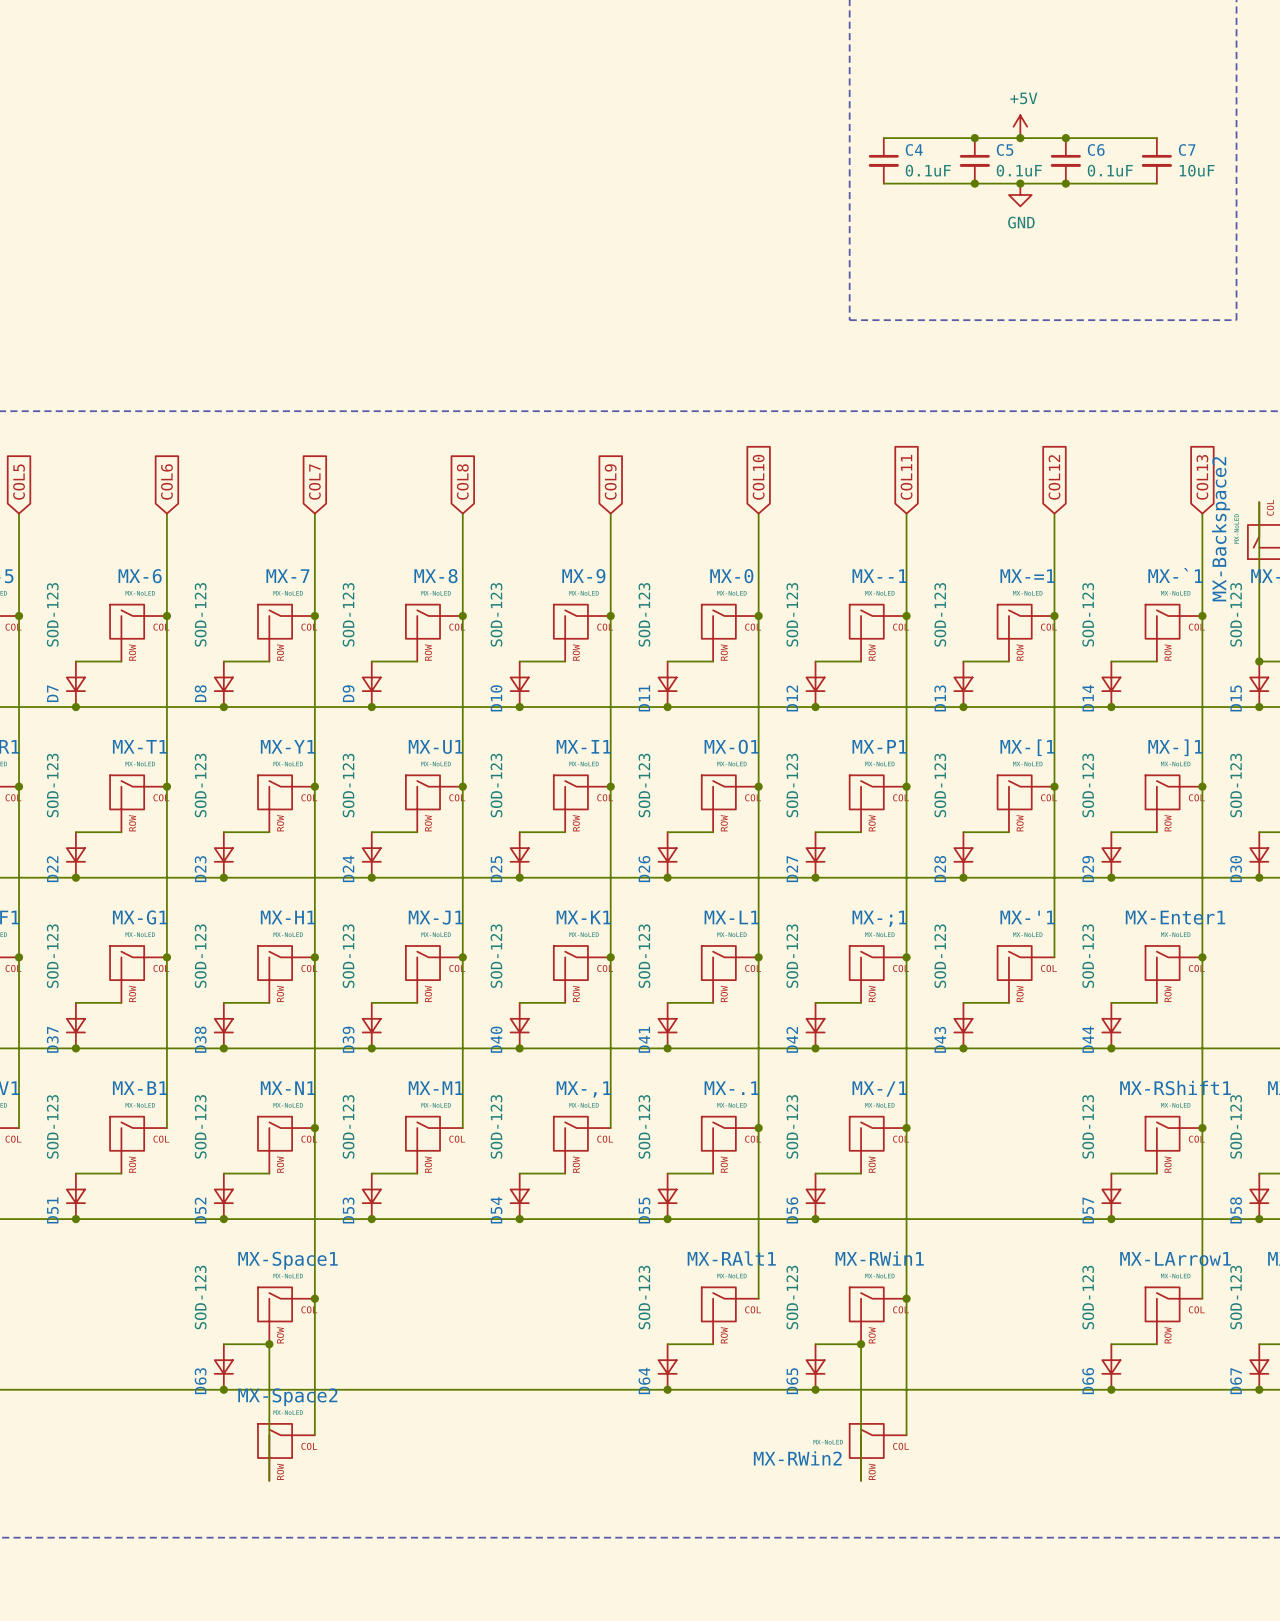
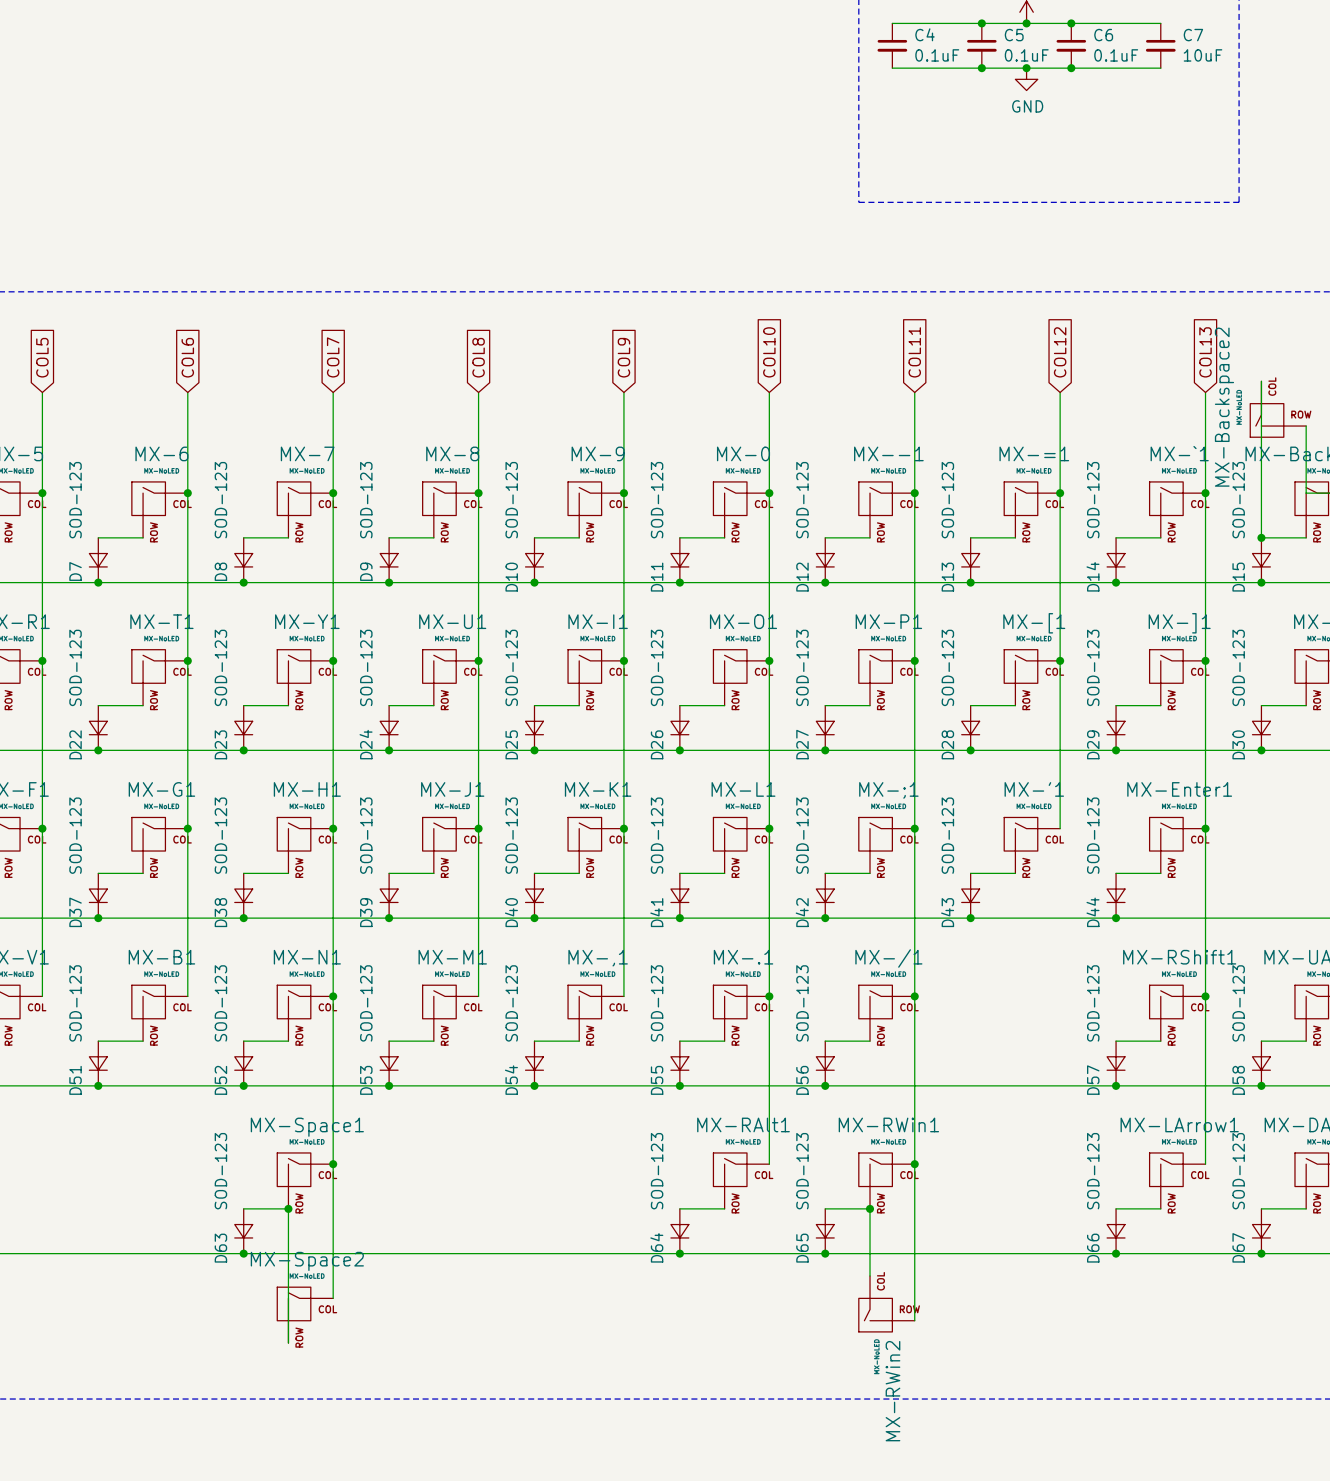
wire: none -> (914, 1298) (914, 1320)
MX-RWin2 rotation: 0° (867, 1441) -> 90° counterclockwise (875, 1314)

